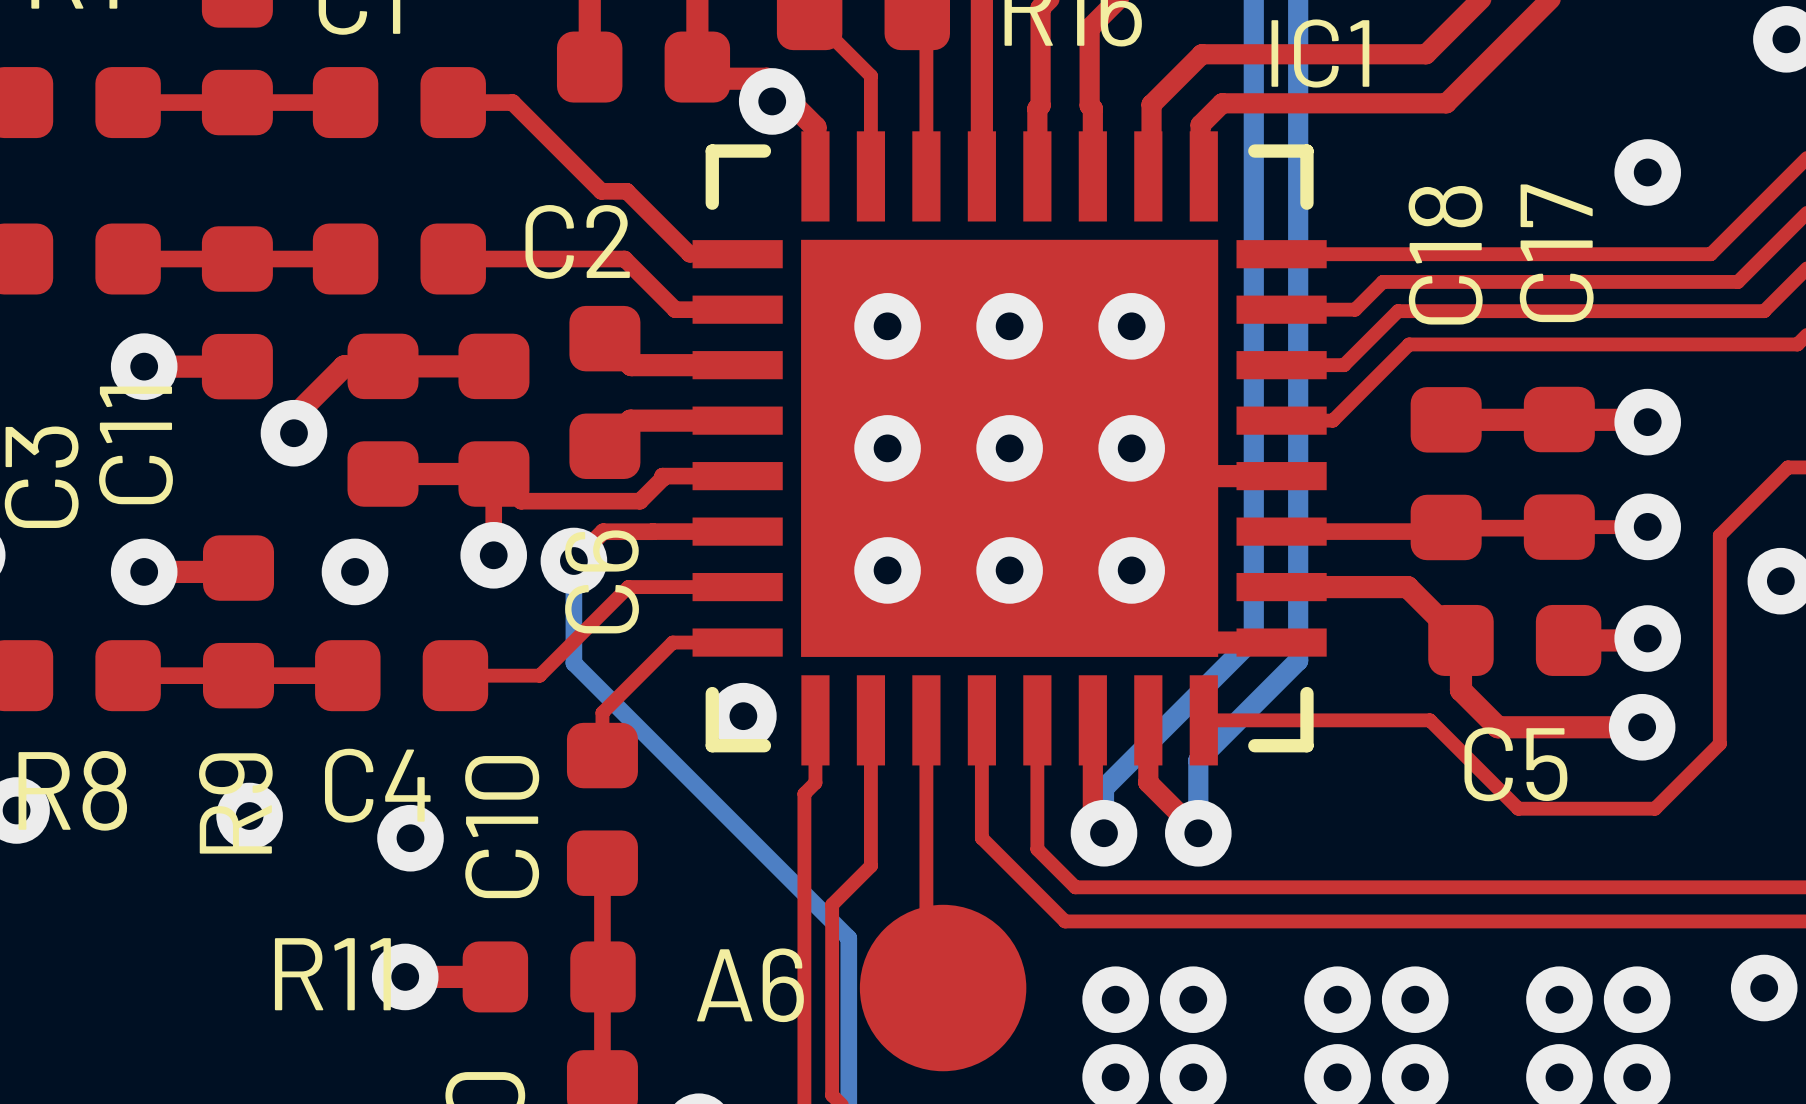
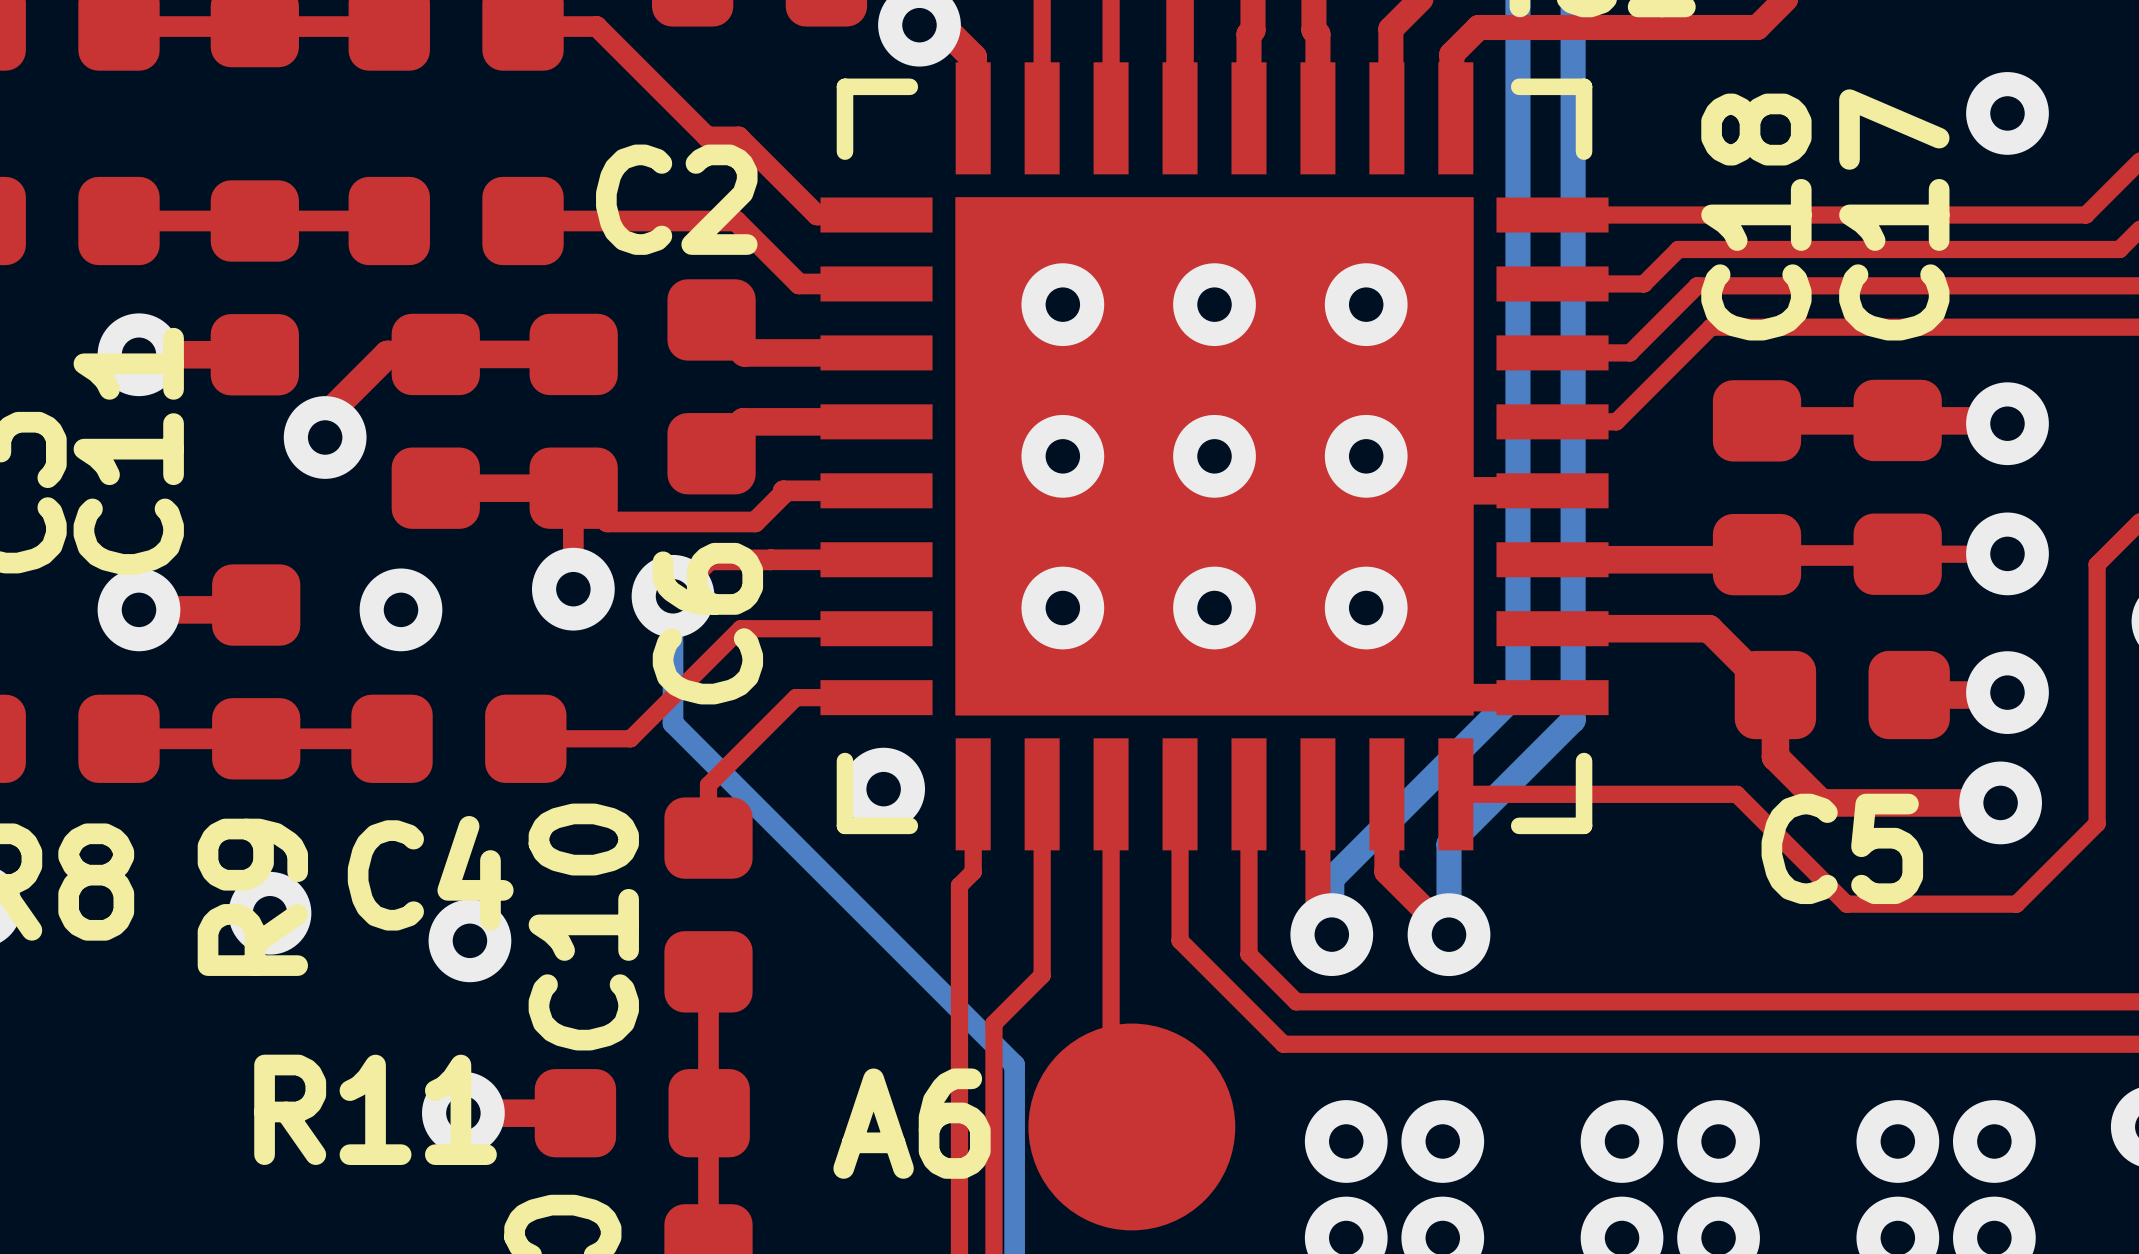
top track width: thin (1281, 531) (1453, 531) -> thick (1552, 559) (1766, 559)

